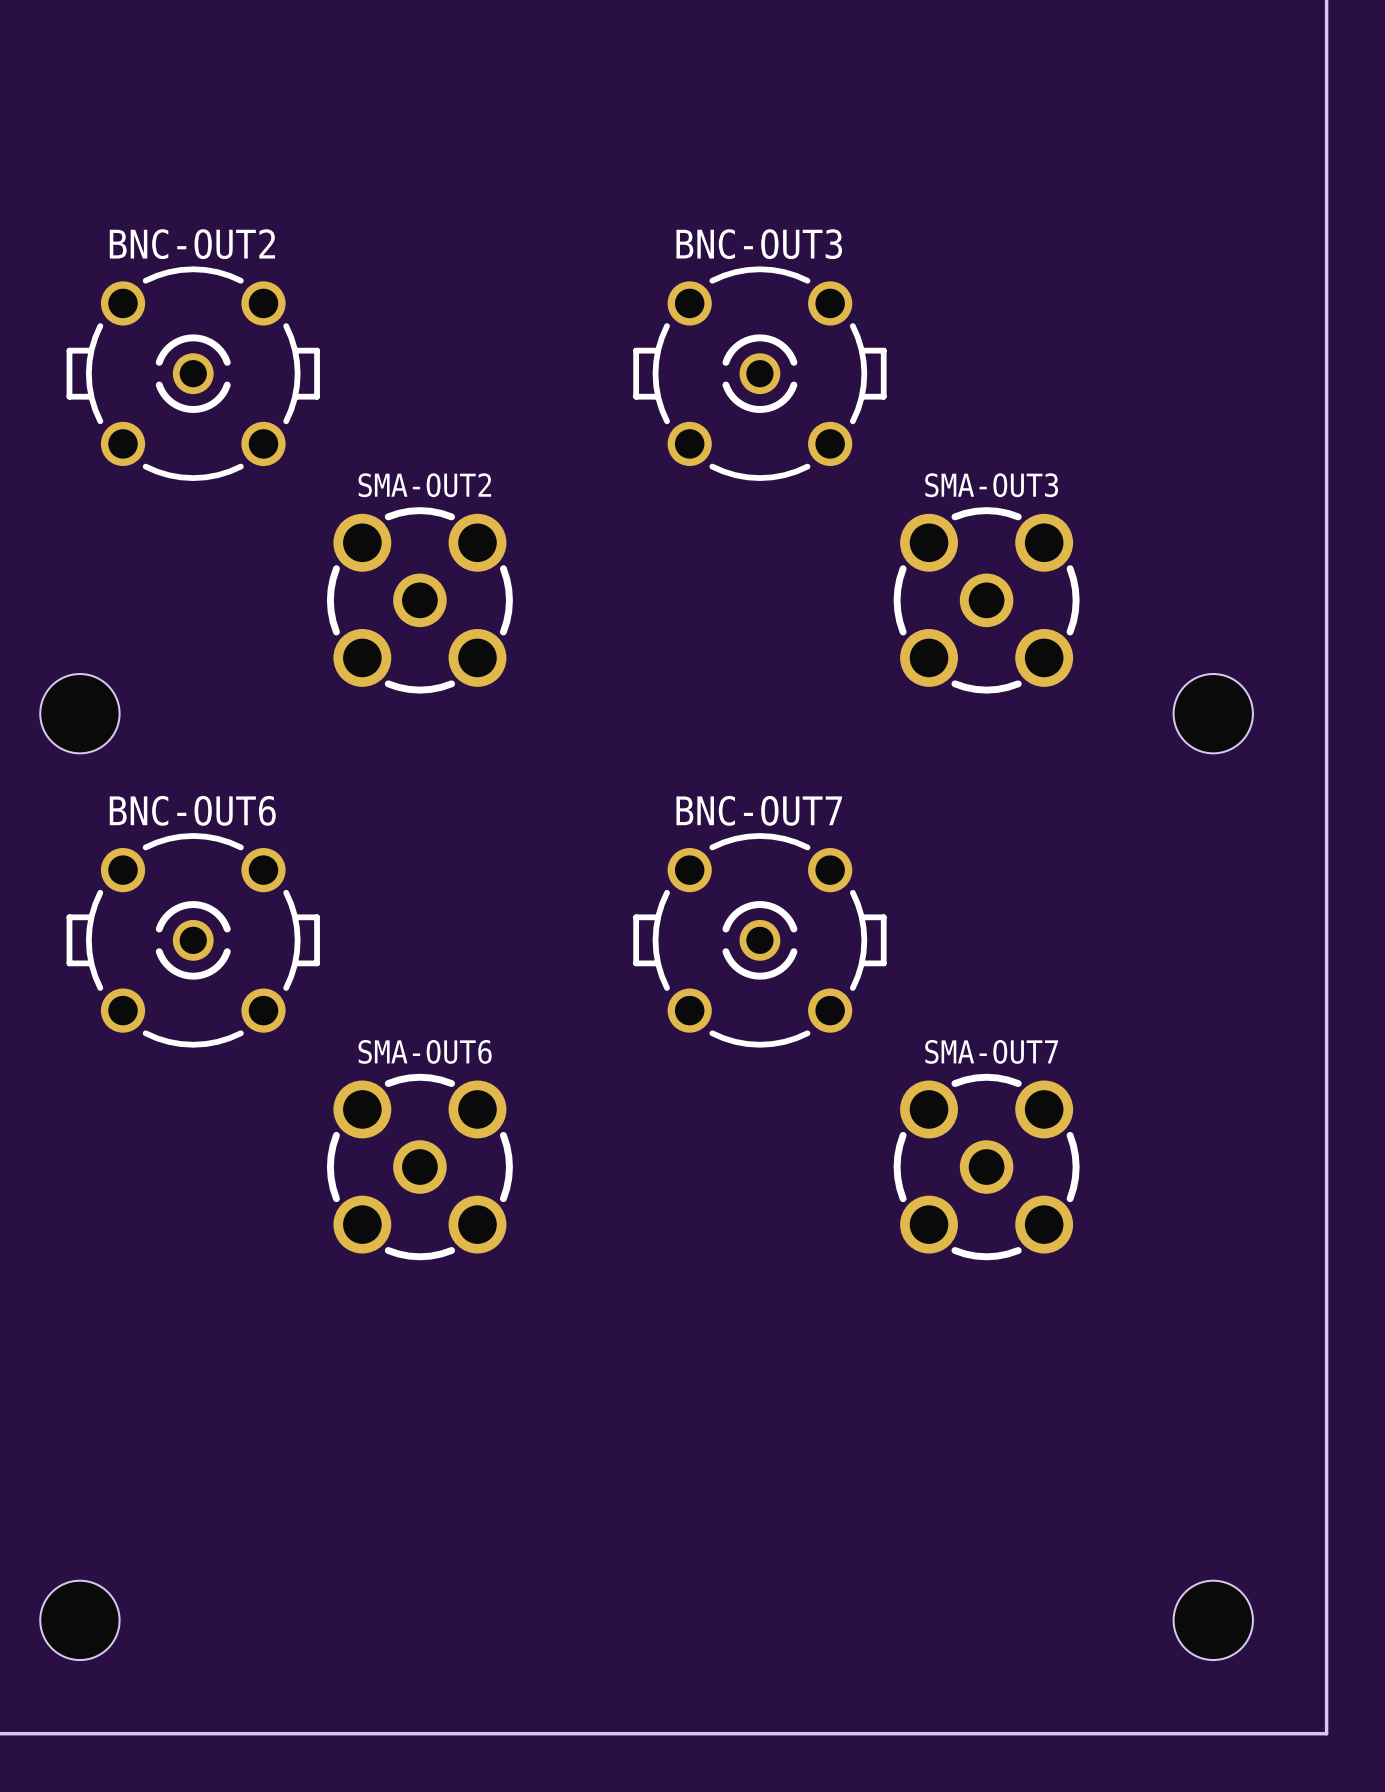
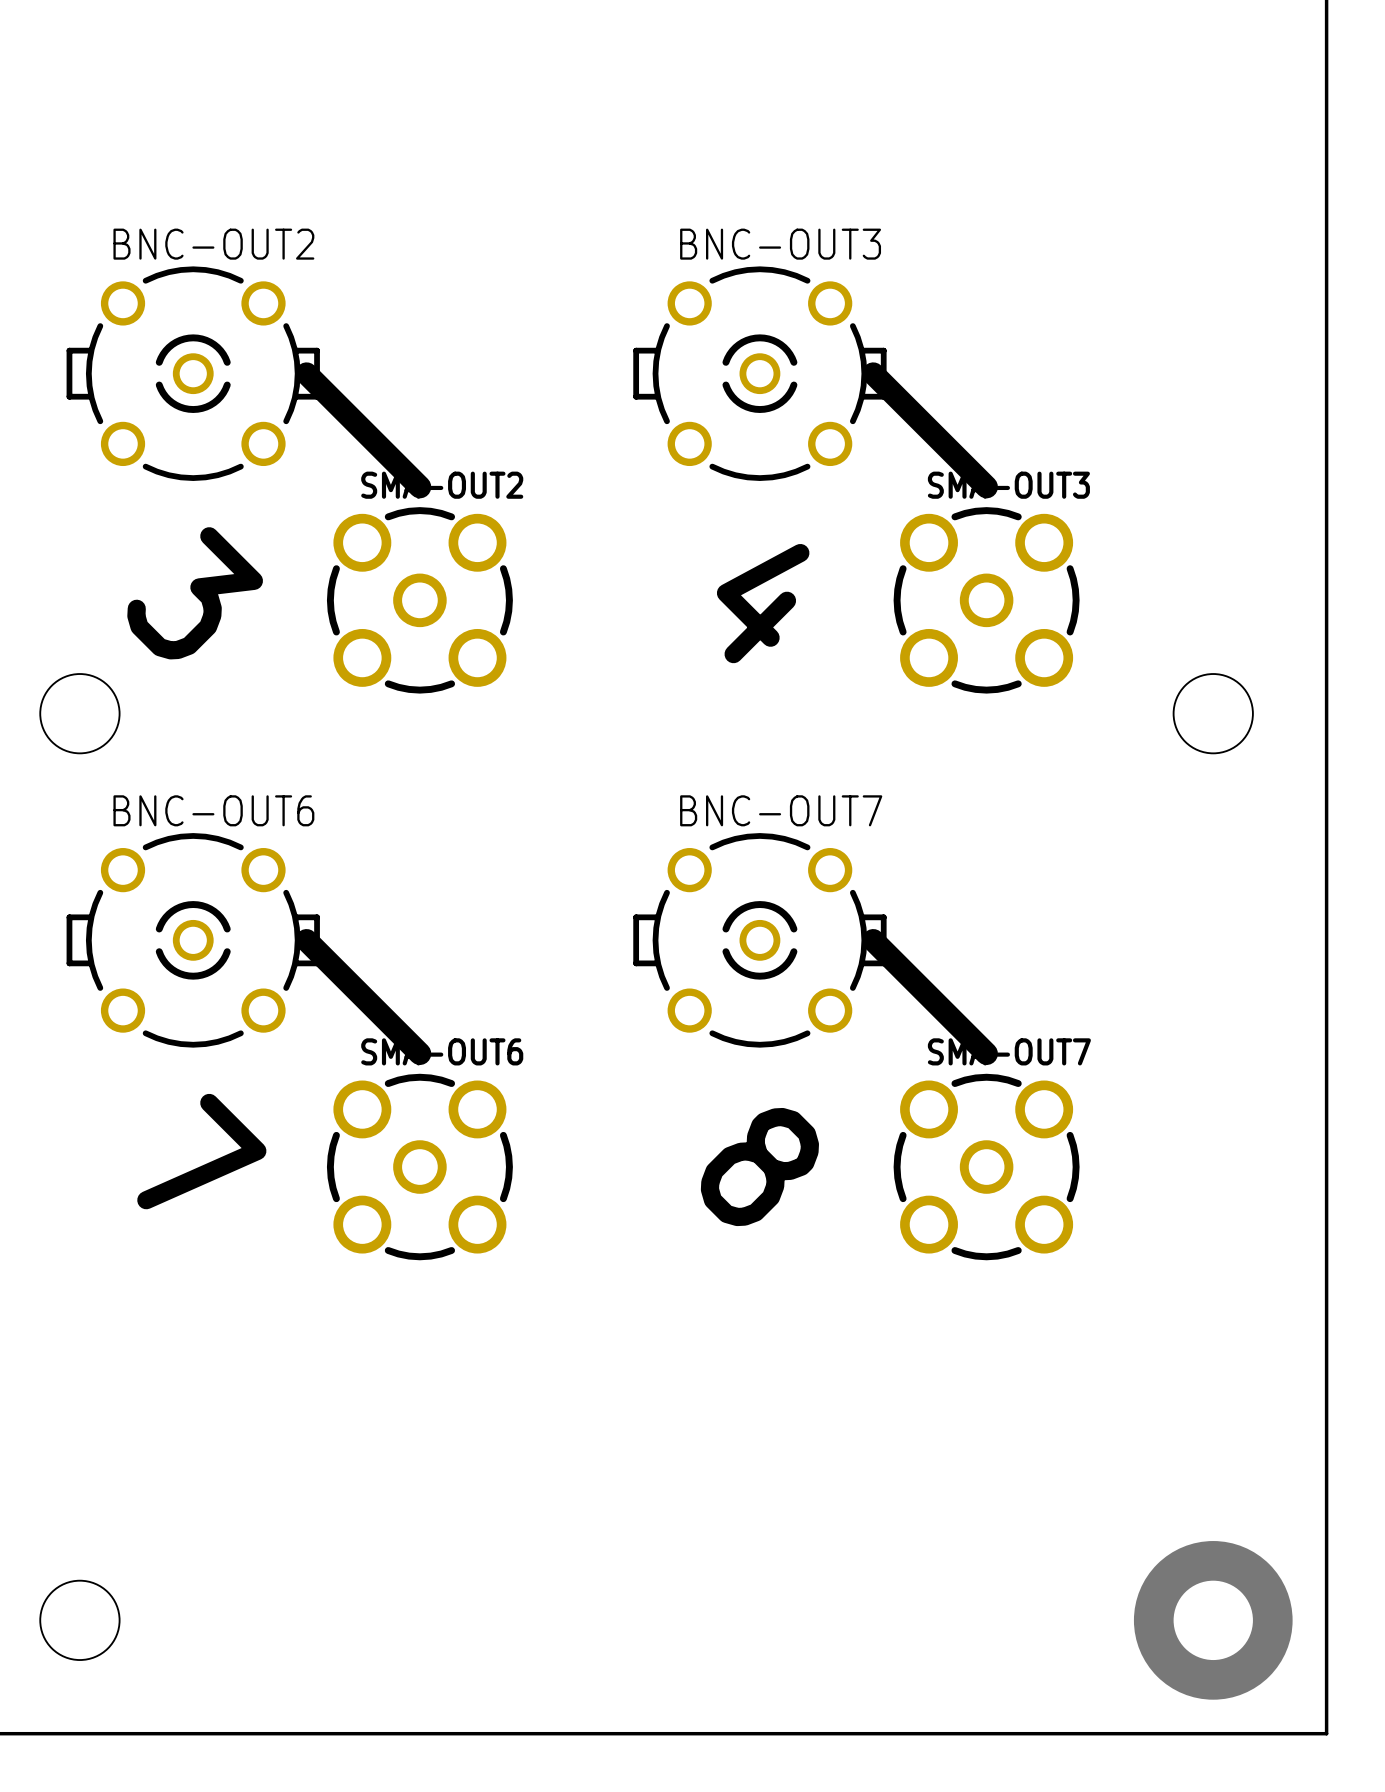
line: none -> (306, 373) (419, 487)
line: none -> (873, 373) (986, 487)
text: none -> 3 (195, 593)
text: none -> 4 (763, 603)
line: none -> (306, 940) (419, 1053)
line: none -> (873, 940) (986, 1053)
text: none -> 7 (201, 1151)
text: none -> 8 (759, 1167)
hole: (1213, 1620) -> none
via: none -> (1213, 1620)

